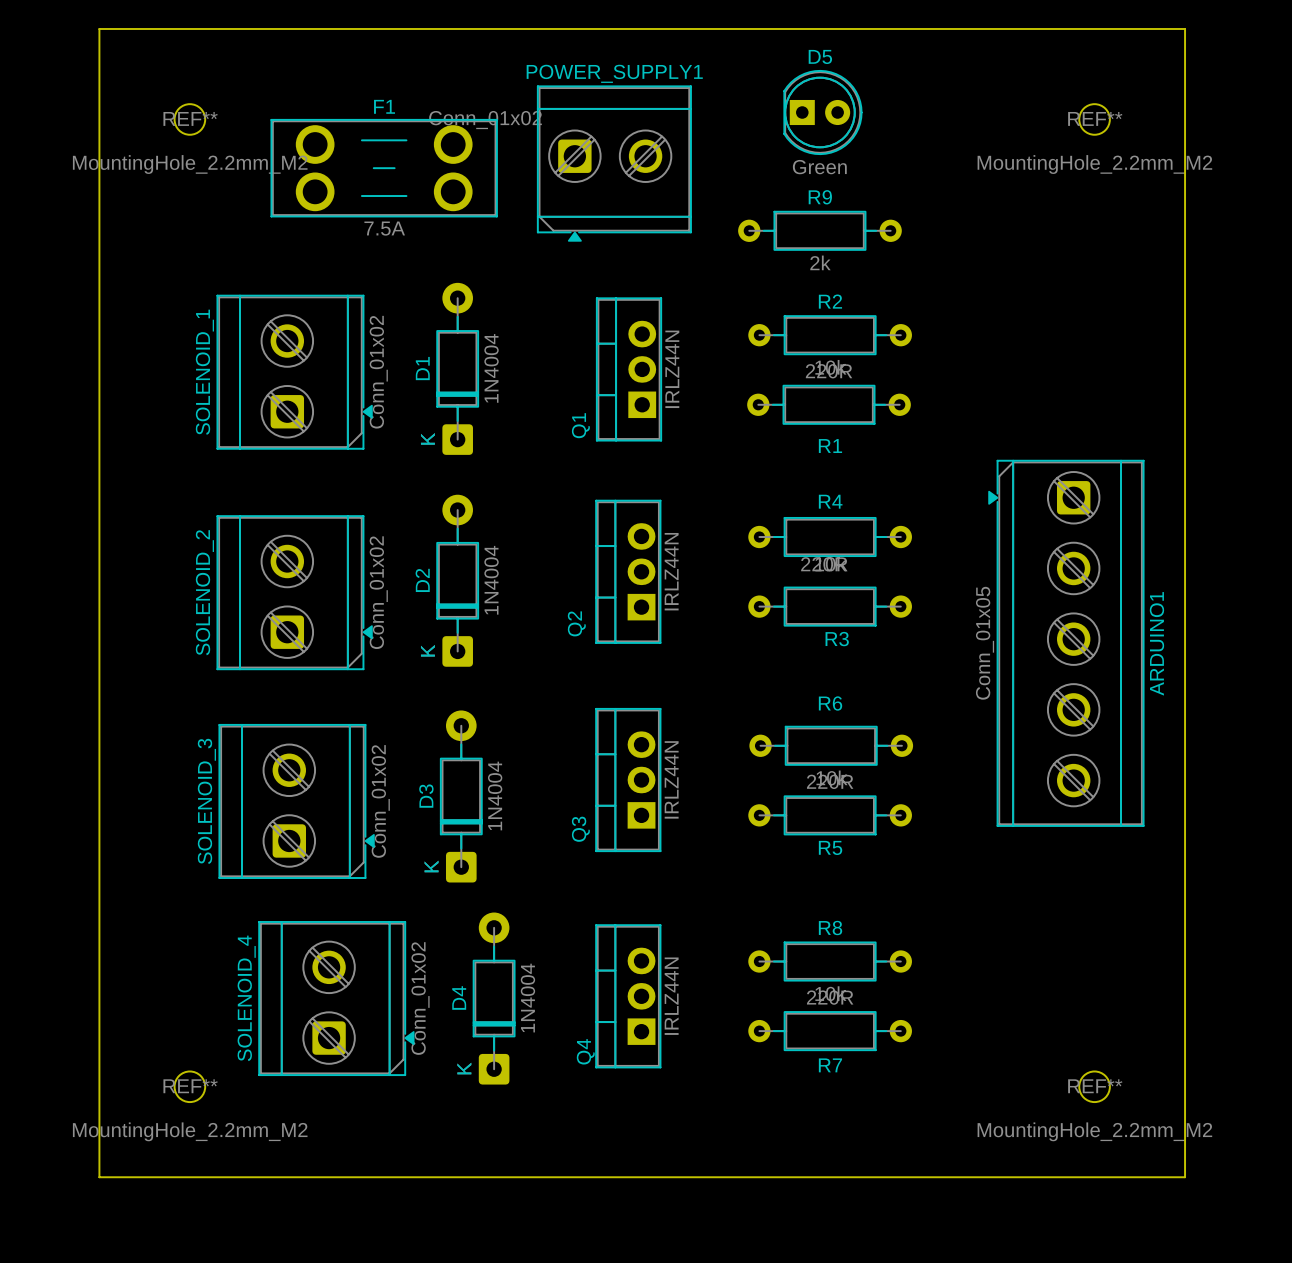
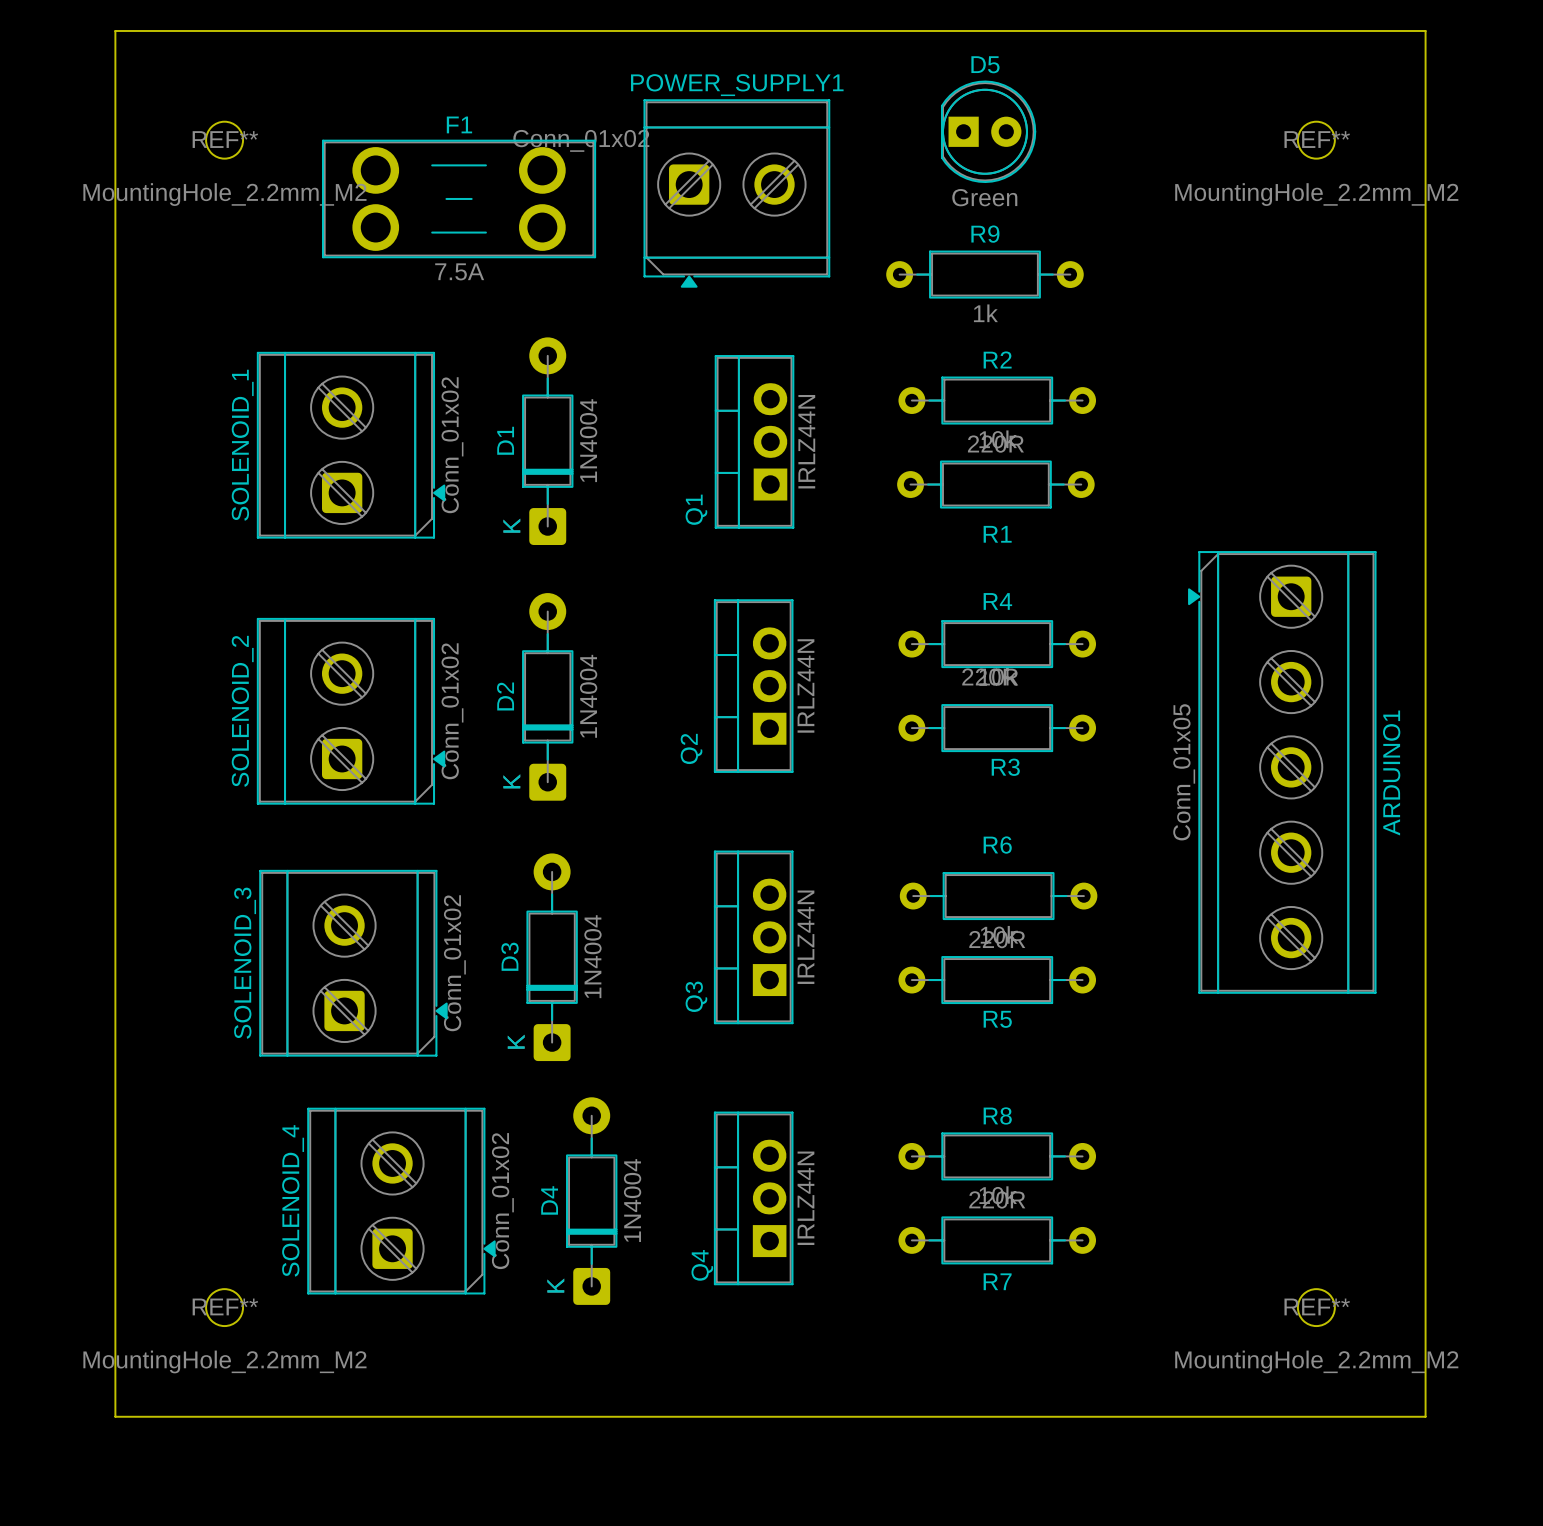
R9 value: 2k (820, 262) -> 1k (985, 313)

